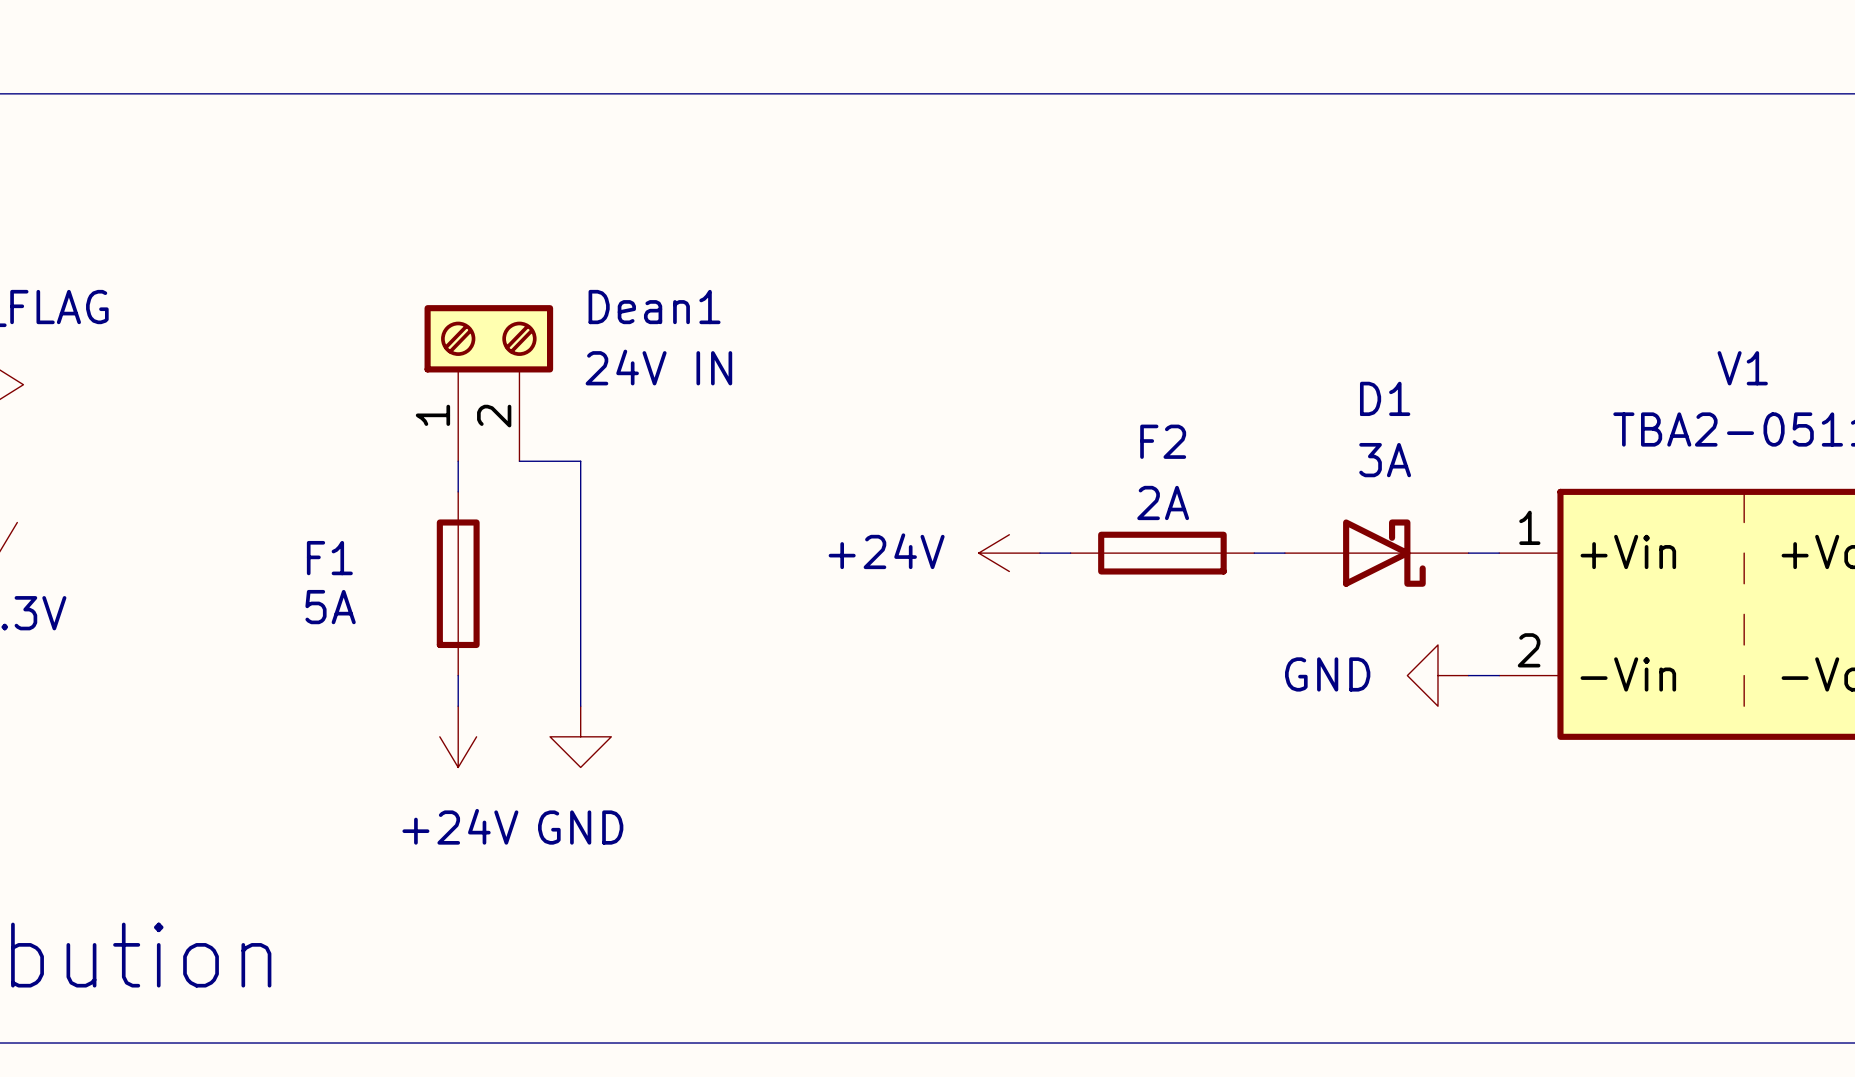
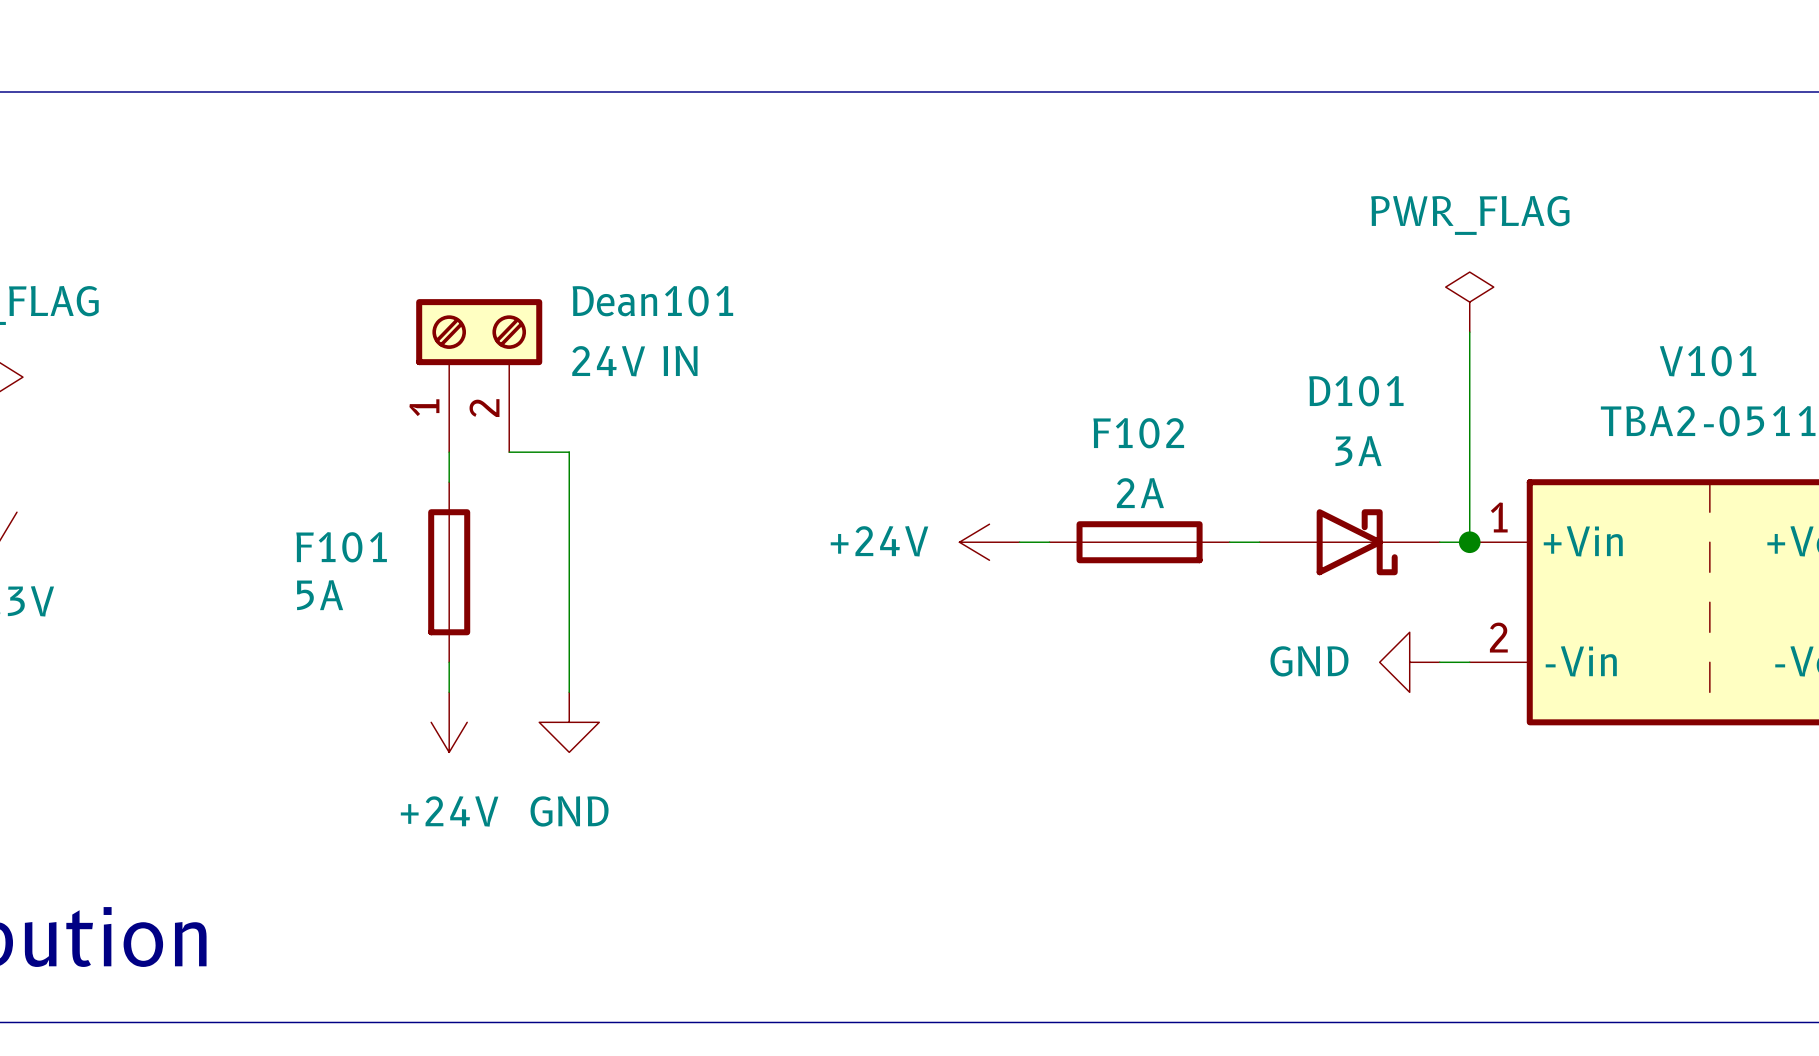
Dean1 name: Dean1 (654, 307) -> Dean101 (652, 301)
power symbol: none -> PWR_FLAG (1469, 302)
wire: none -> (1469, 332) (1469, 542)
V1 name: V1 (1742, 368) -> V101 (1708, 361)
D1 name: D1 (1385, 398) -> D101 (1356, 391)
F2 name: F2 (1163, 441) -> F102 (1138, 433)
junction: none -> (1469, 542)
F1 name: F1 (329, 558) -> F101 (341, 547)

